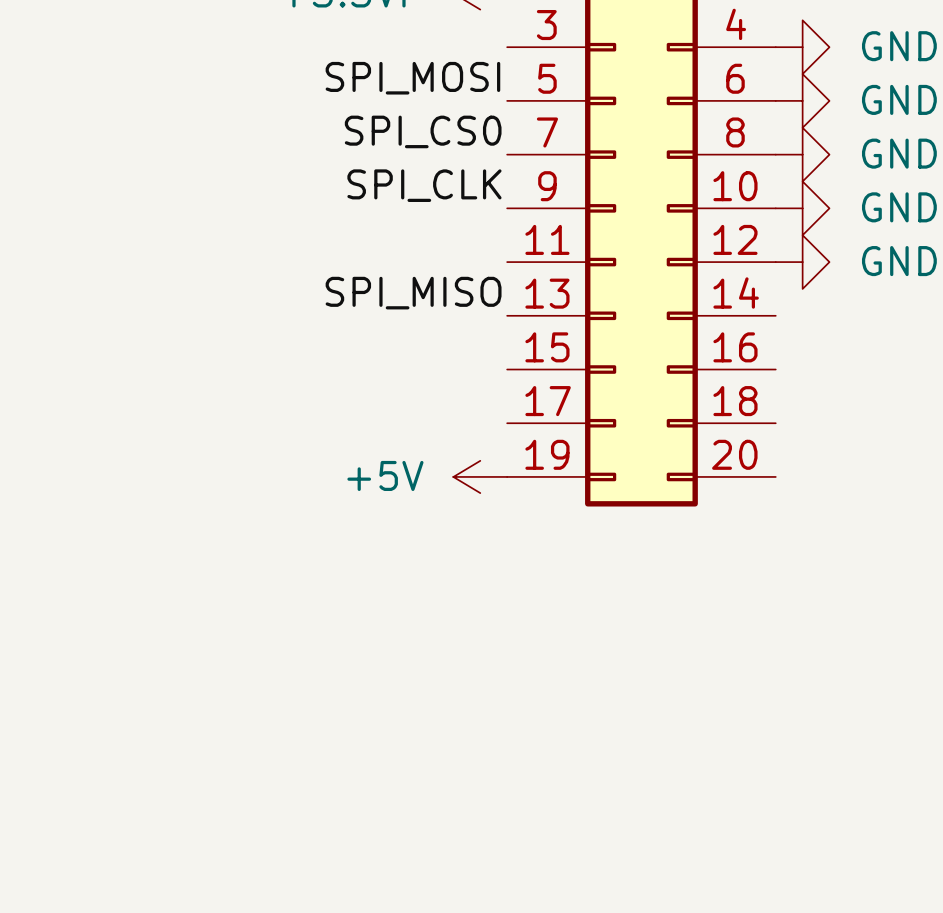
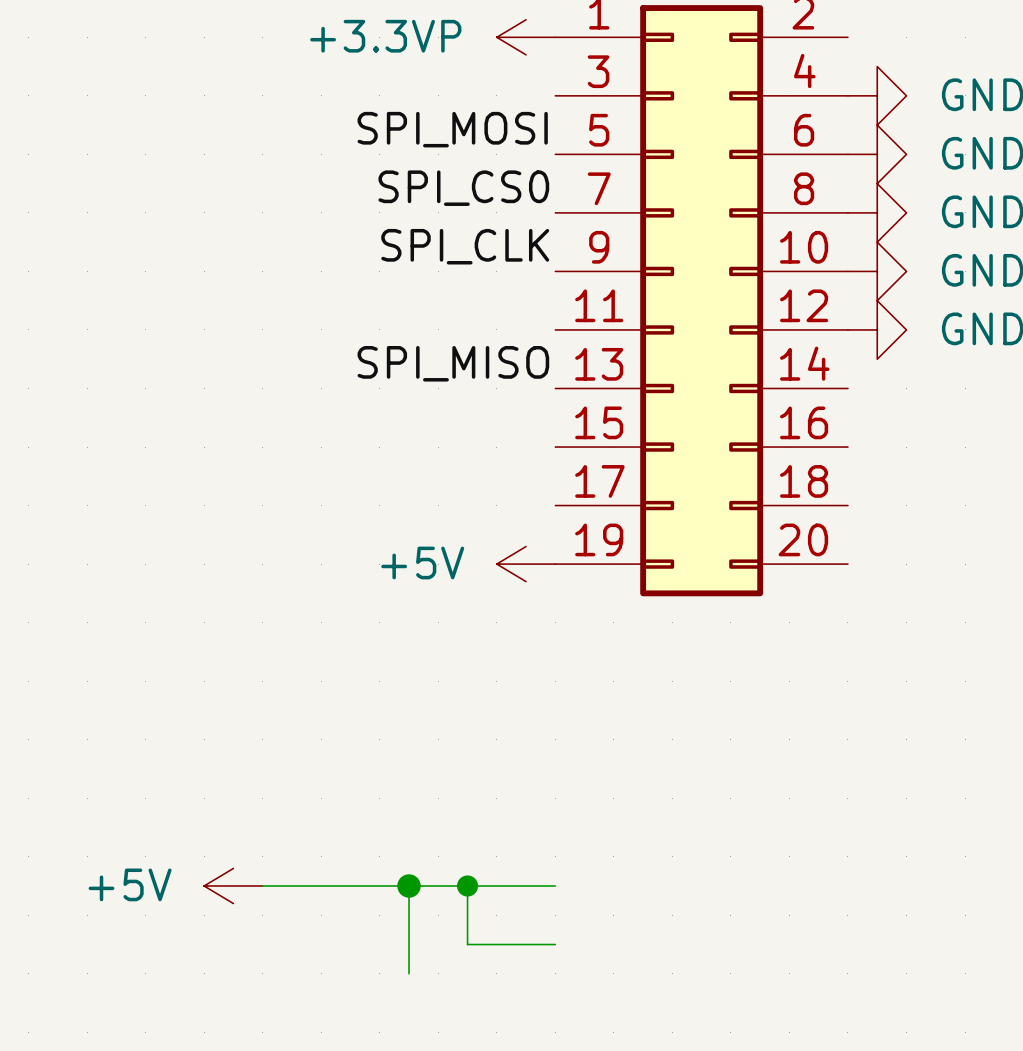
power symbol: none -> +5V (233, 886)
wire: none -> (262, 886) (555, 886)
wire: none -> (409, 886) (409, 973)
junction: none -> (409, 886)
wire: none -> (467, 886) (467, 944) (555, 944)
junction: none -> (467, 886)

